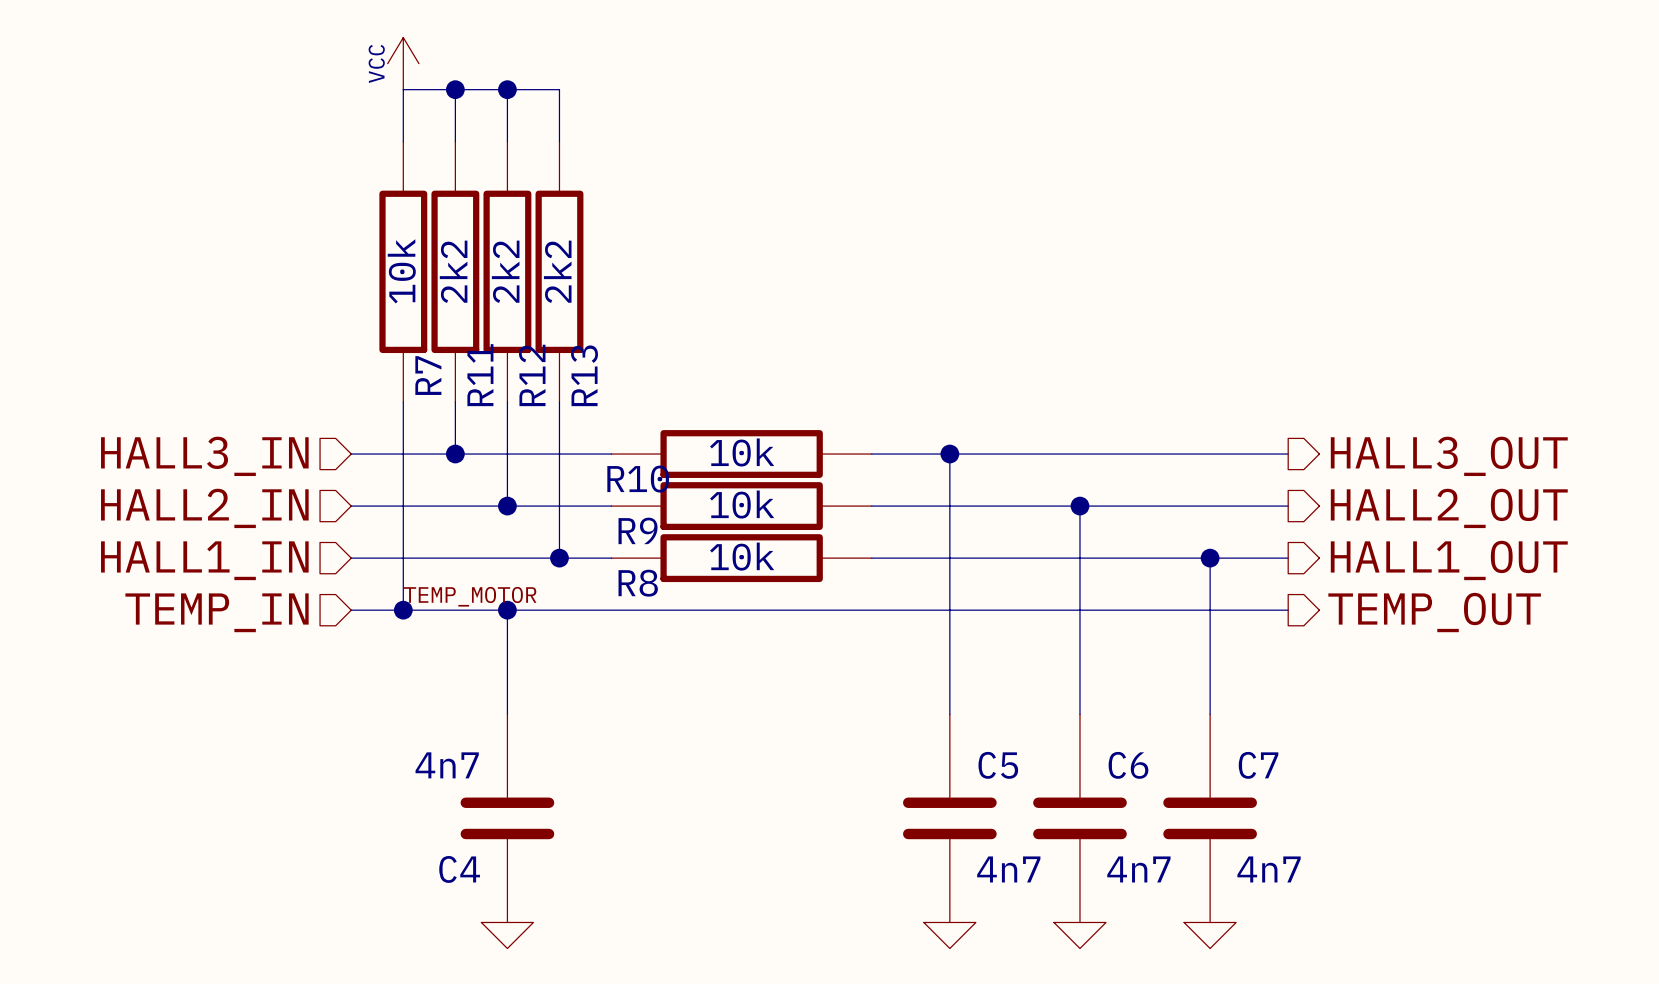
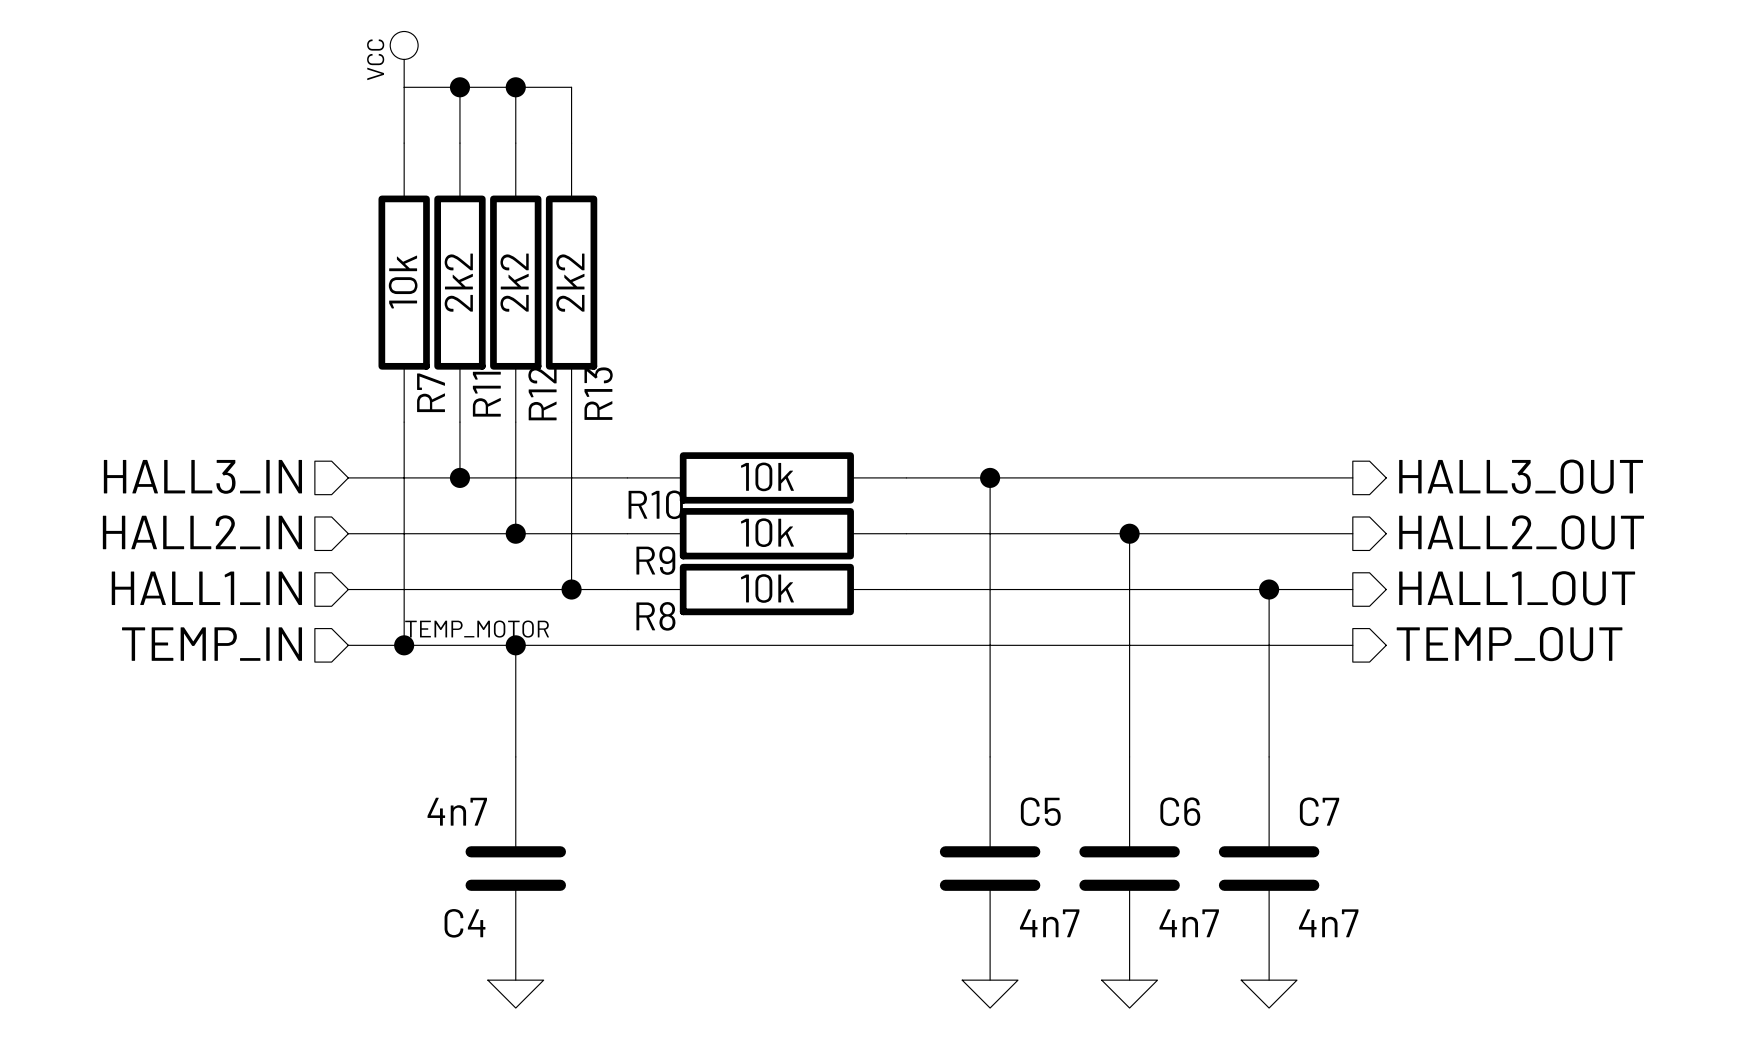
power symbol shape: [387, 37, 419, 90] -> [390, 31, 419, 88]

